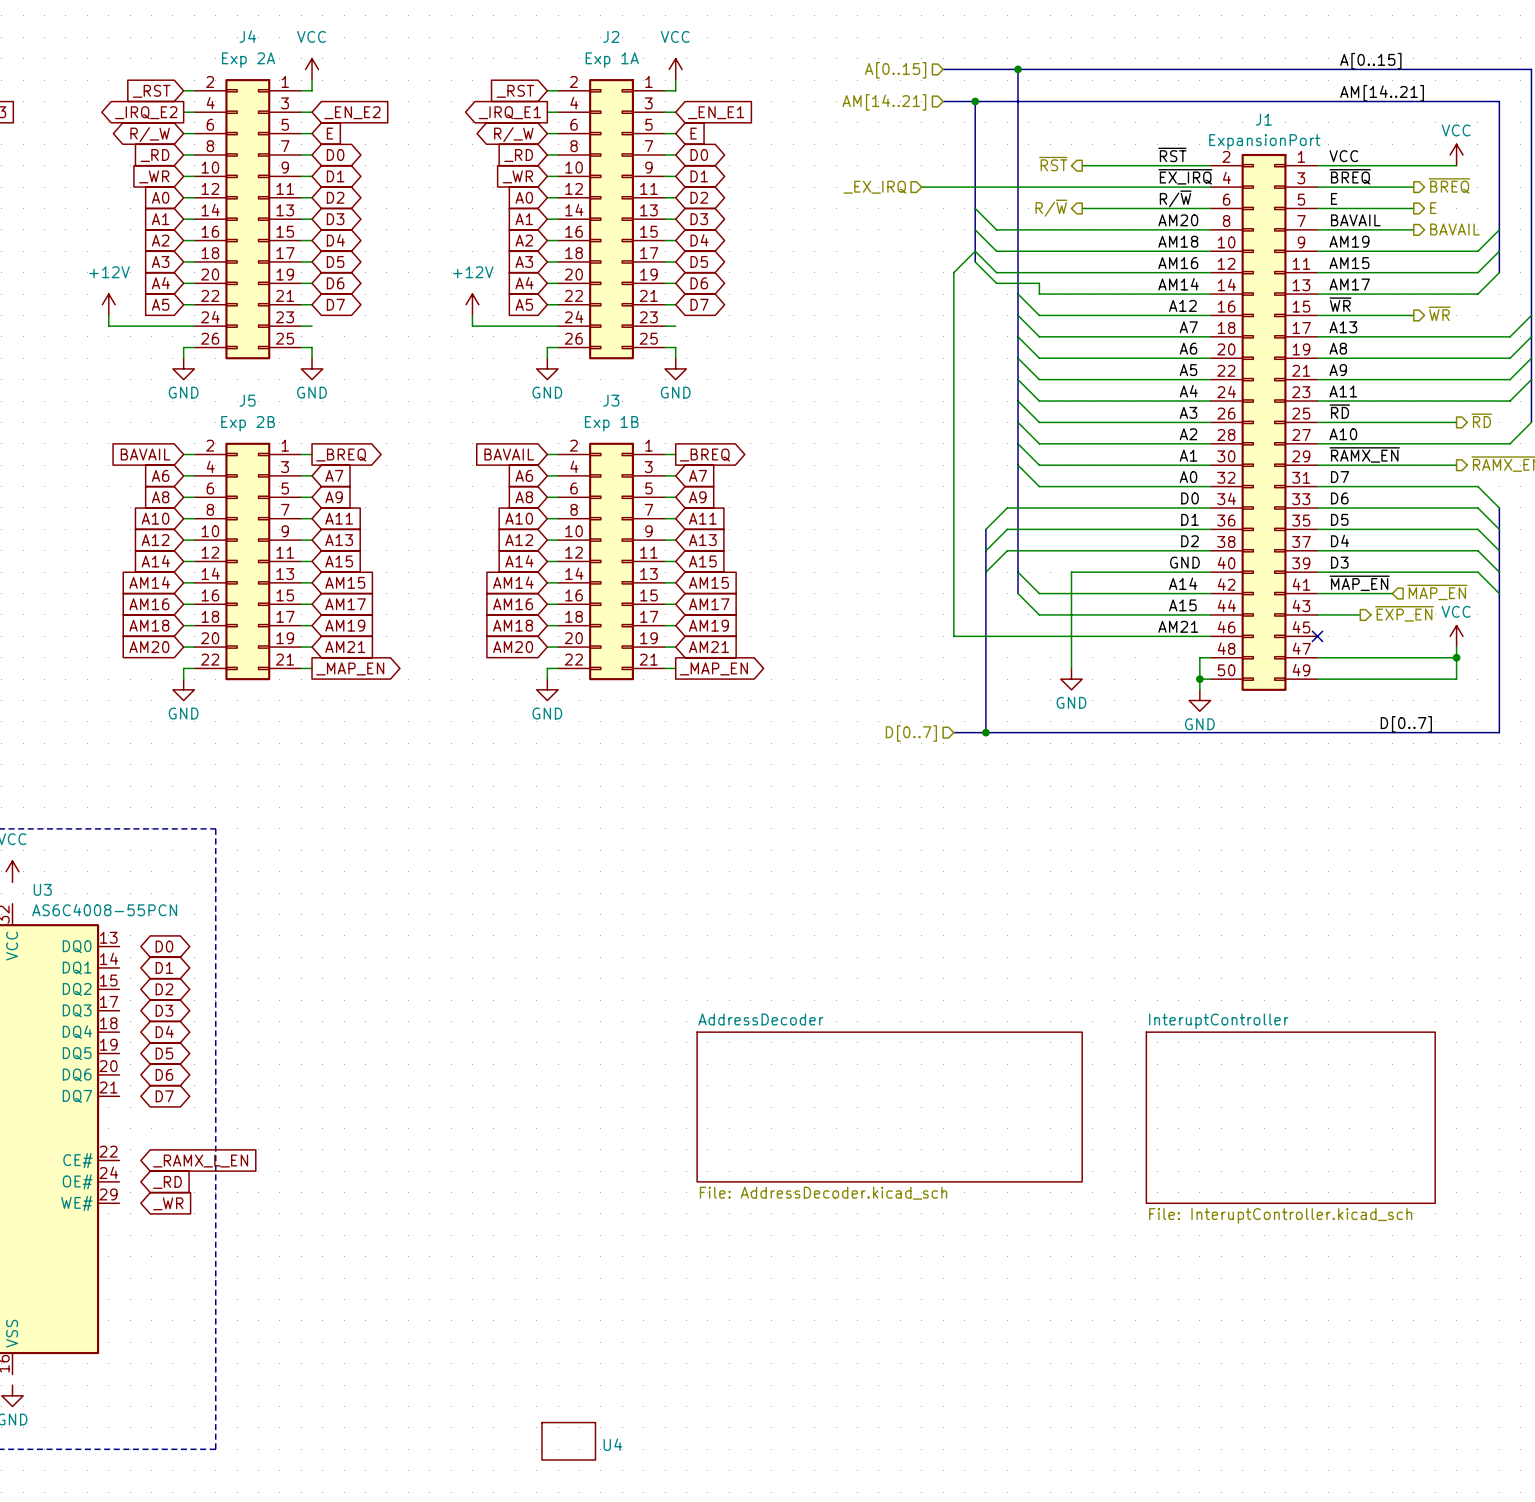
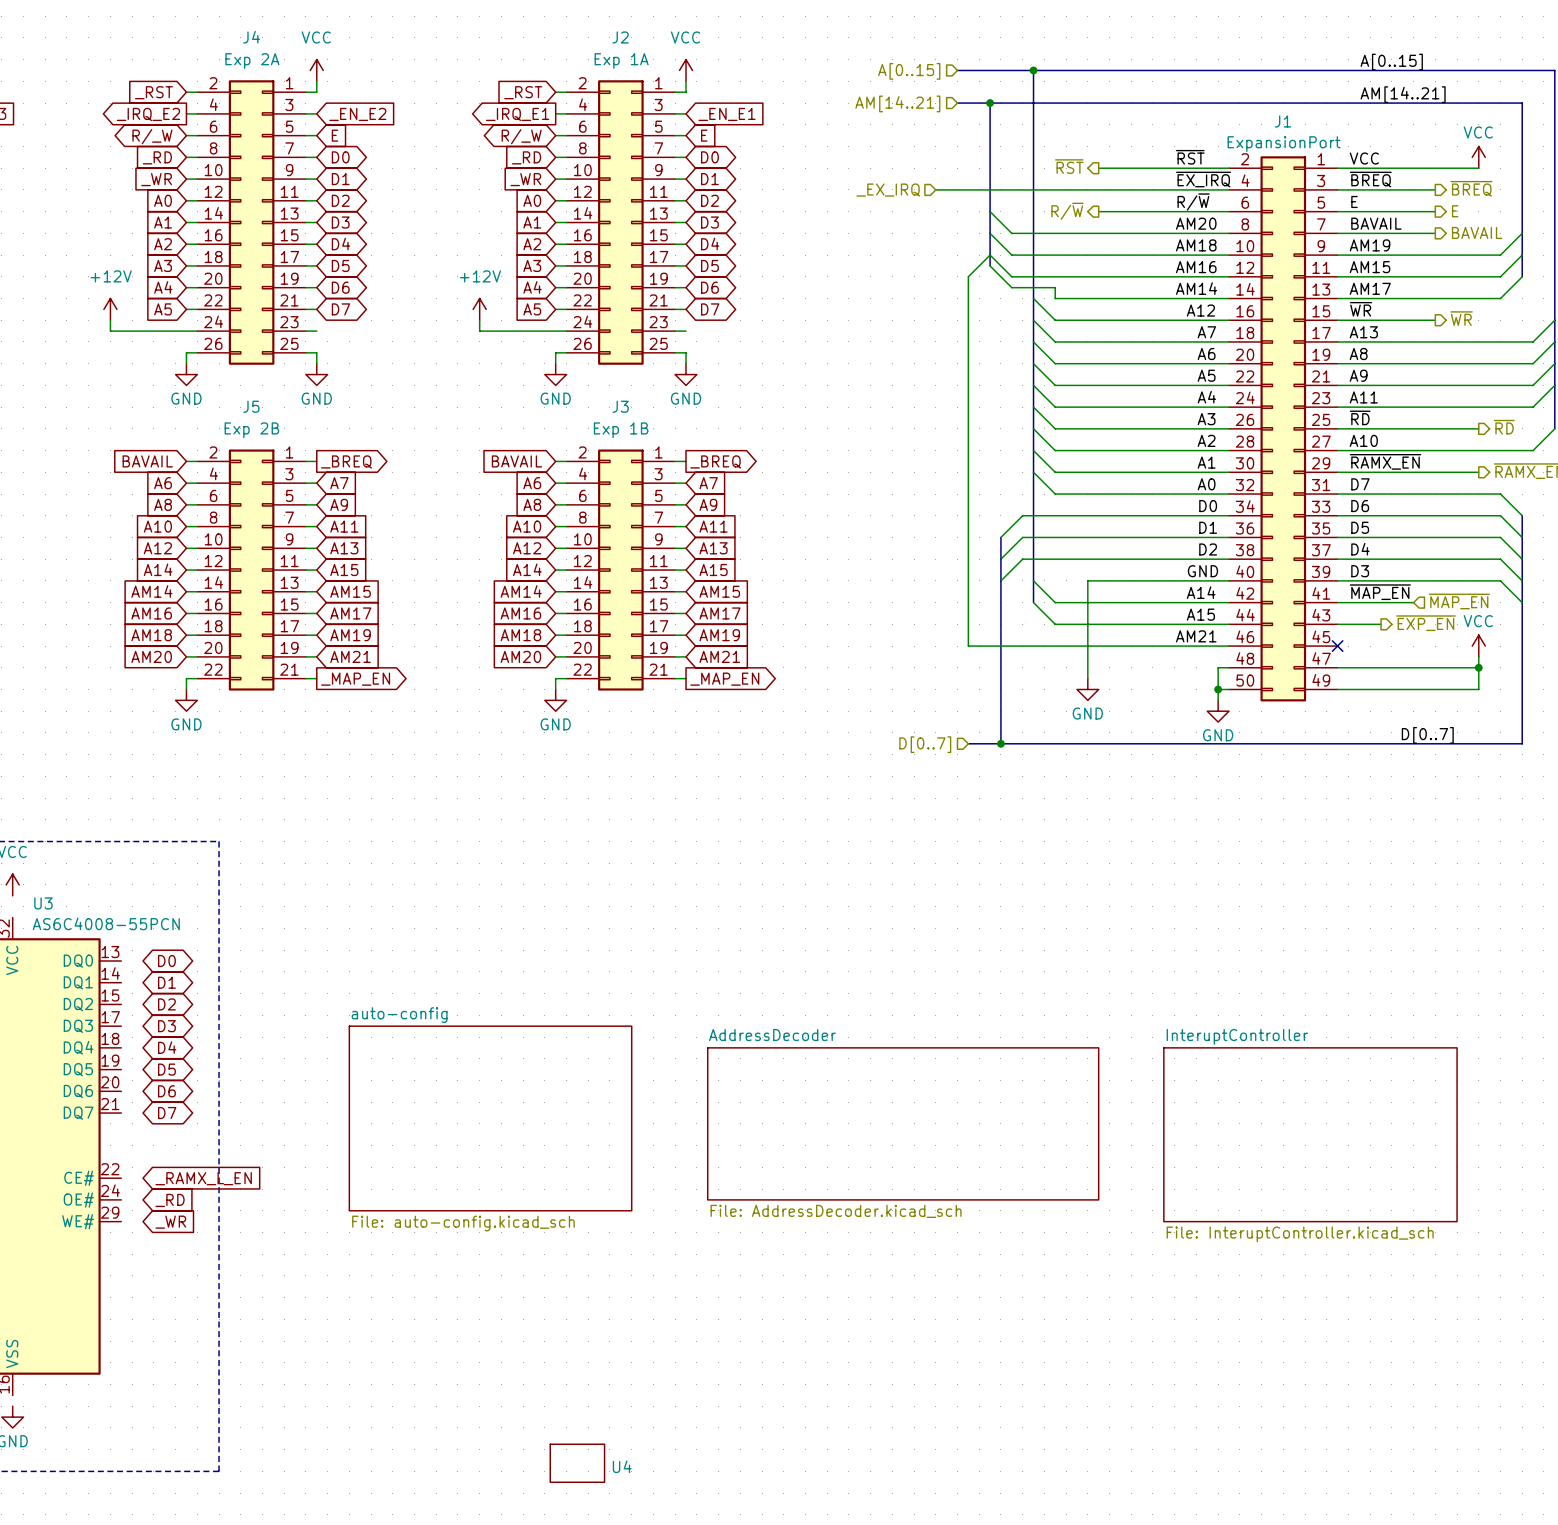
sheet auto-config: none -> File: auto-config.kicad_sch (490, 1118)

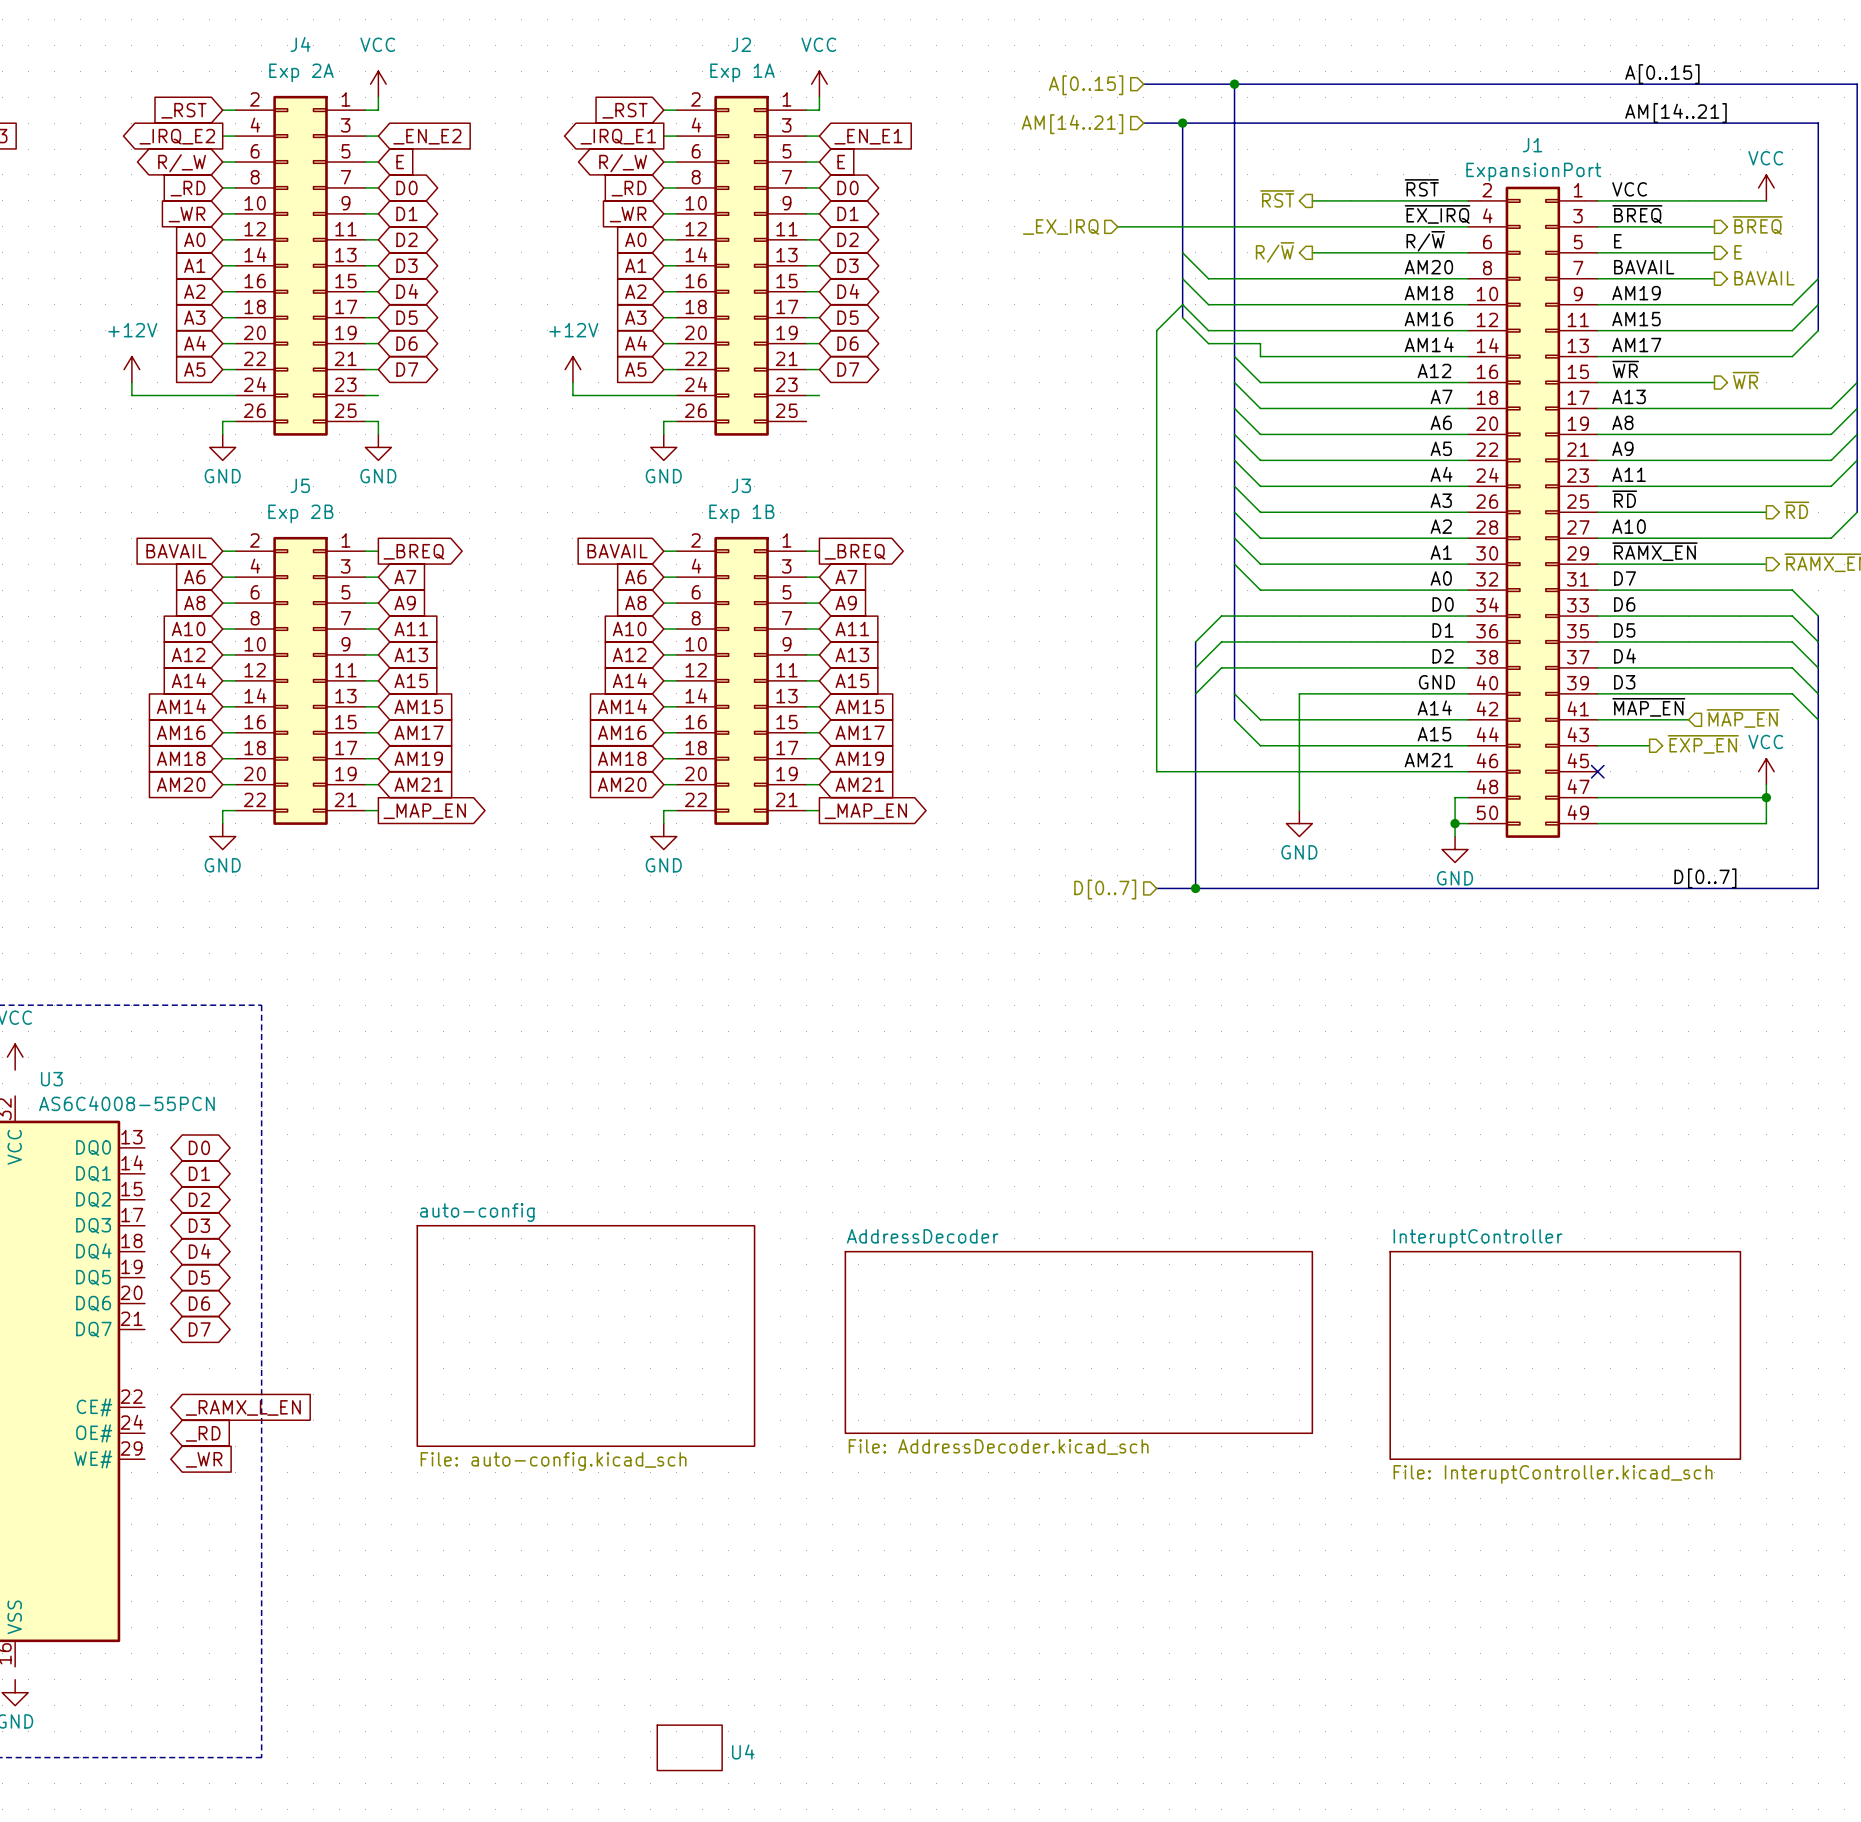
wire: (675, 352) (686, 352) (686, 363) -> none
power symbol: GND (686, 374) -> none

